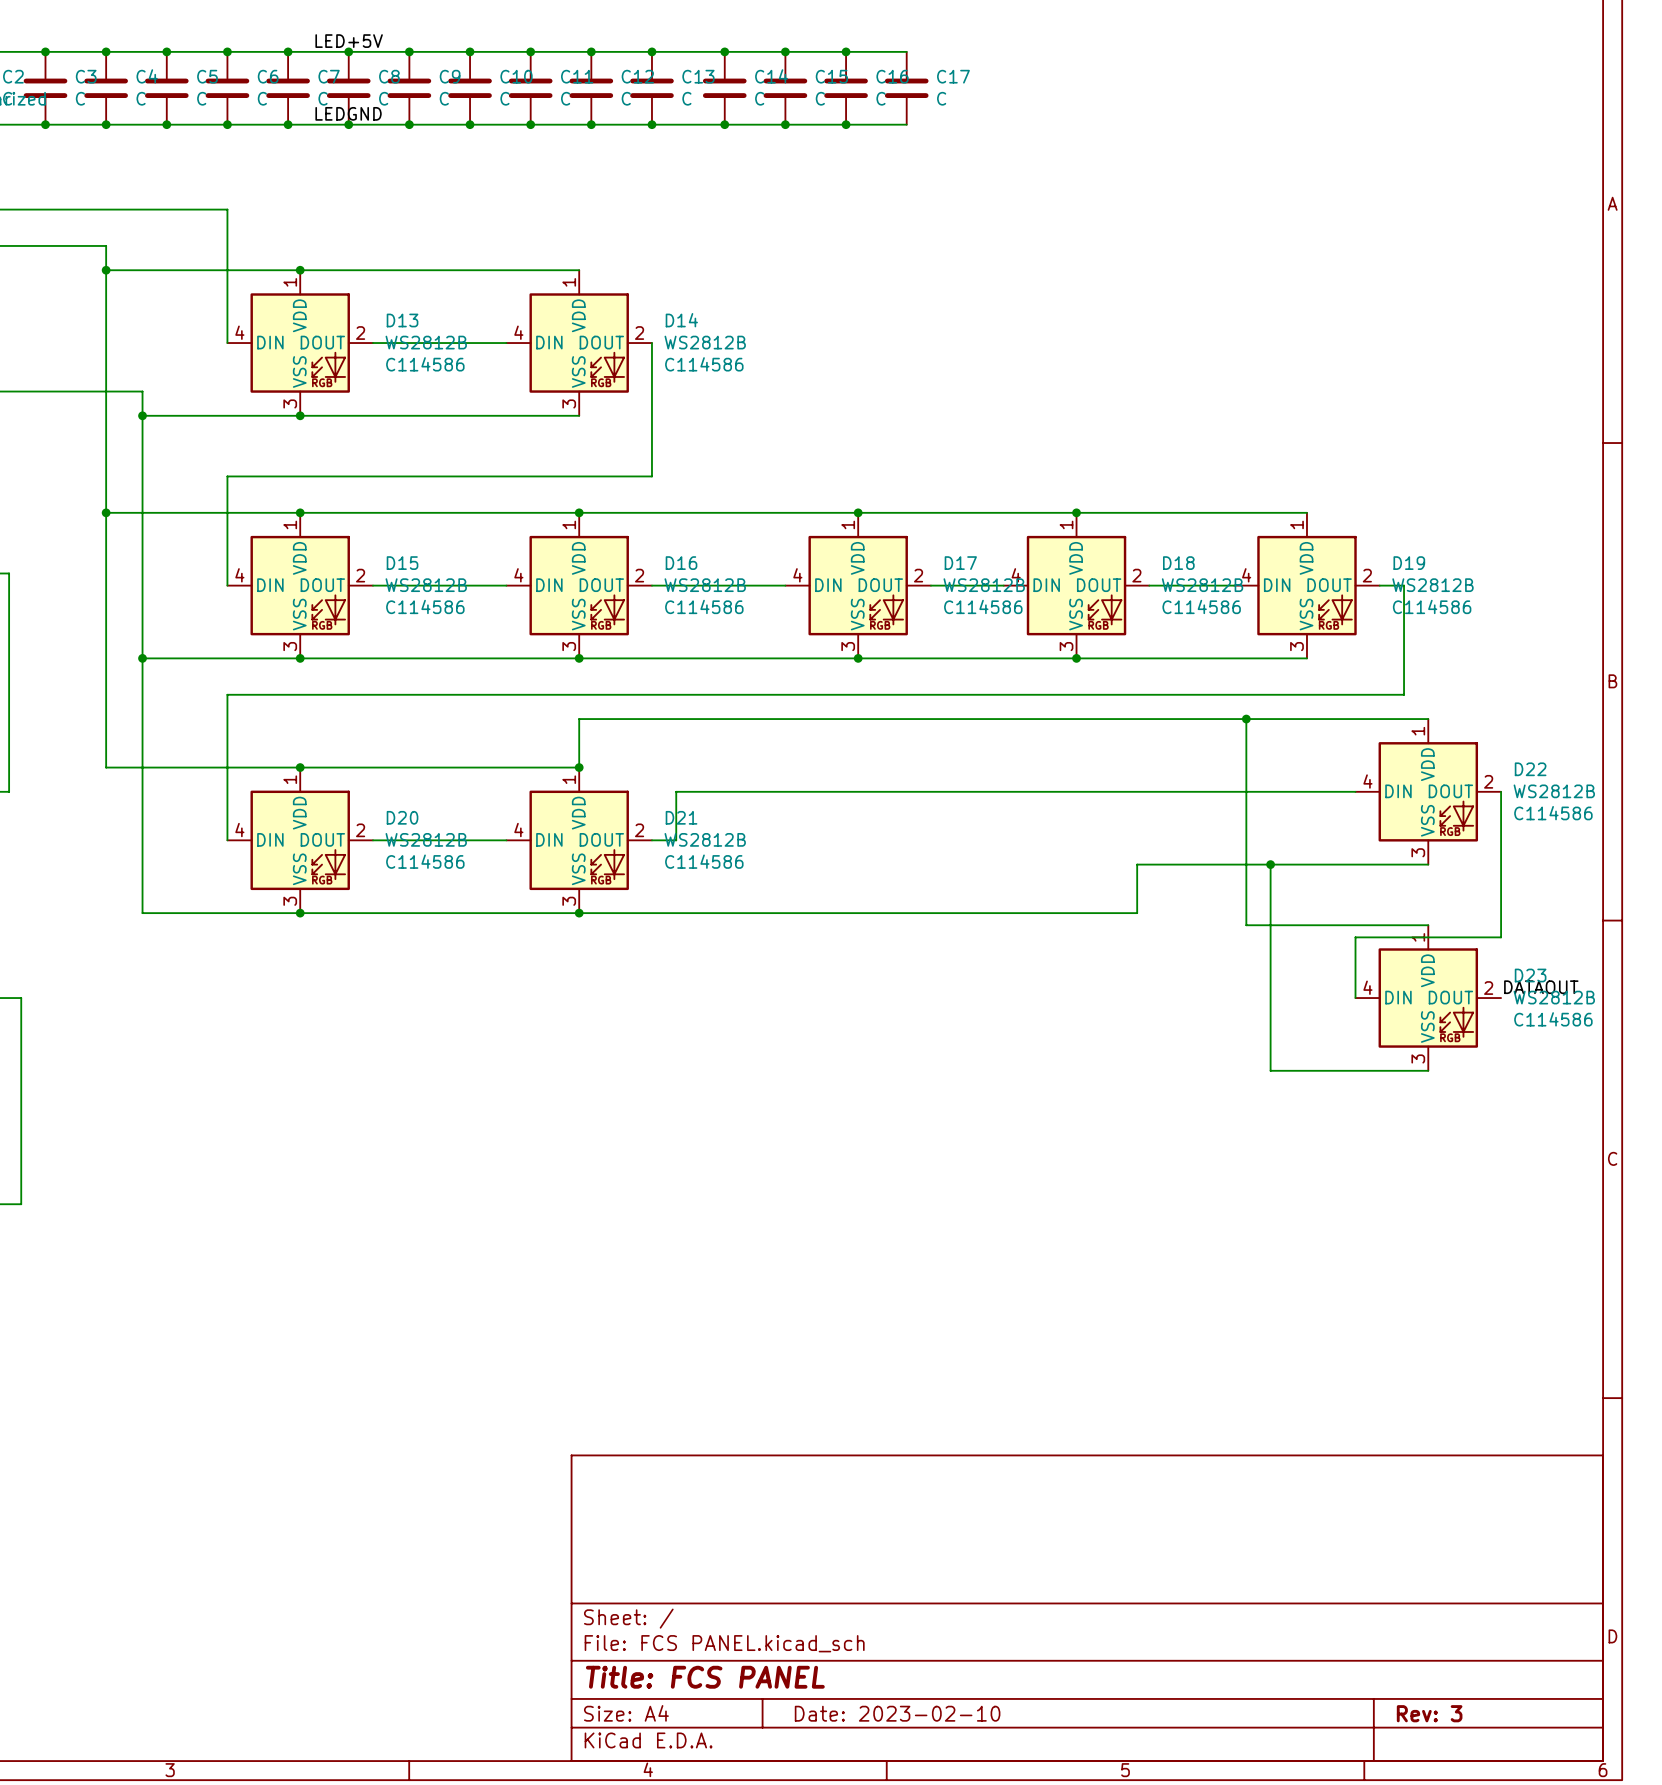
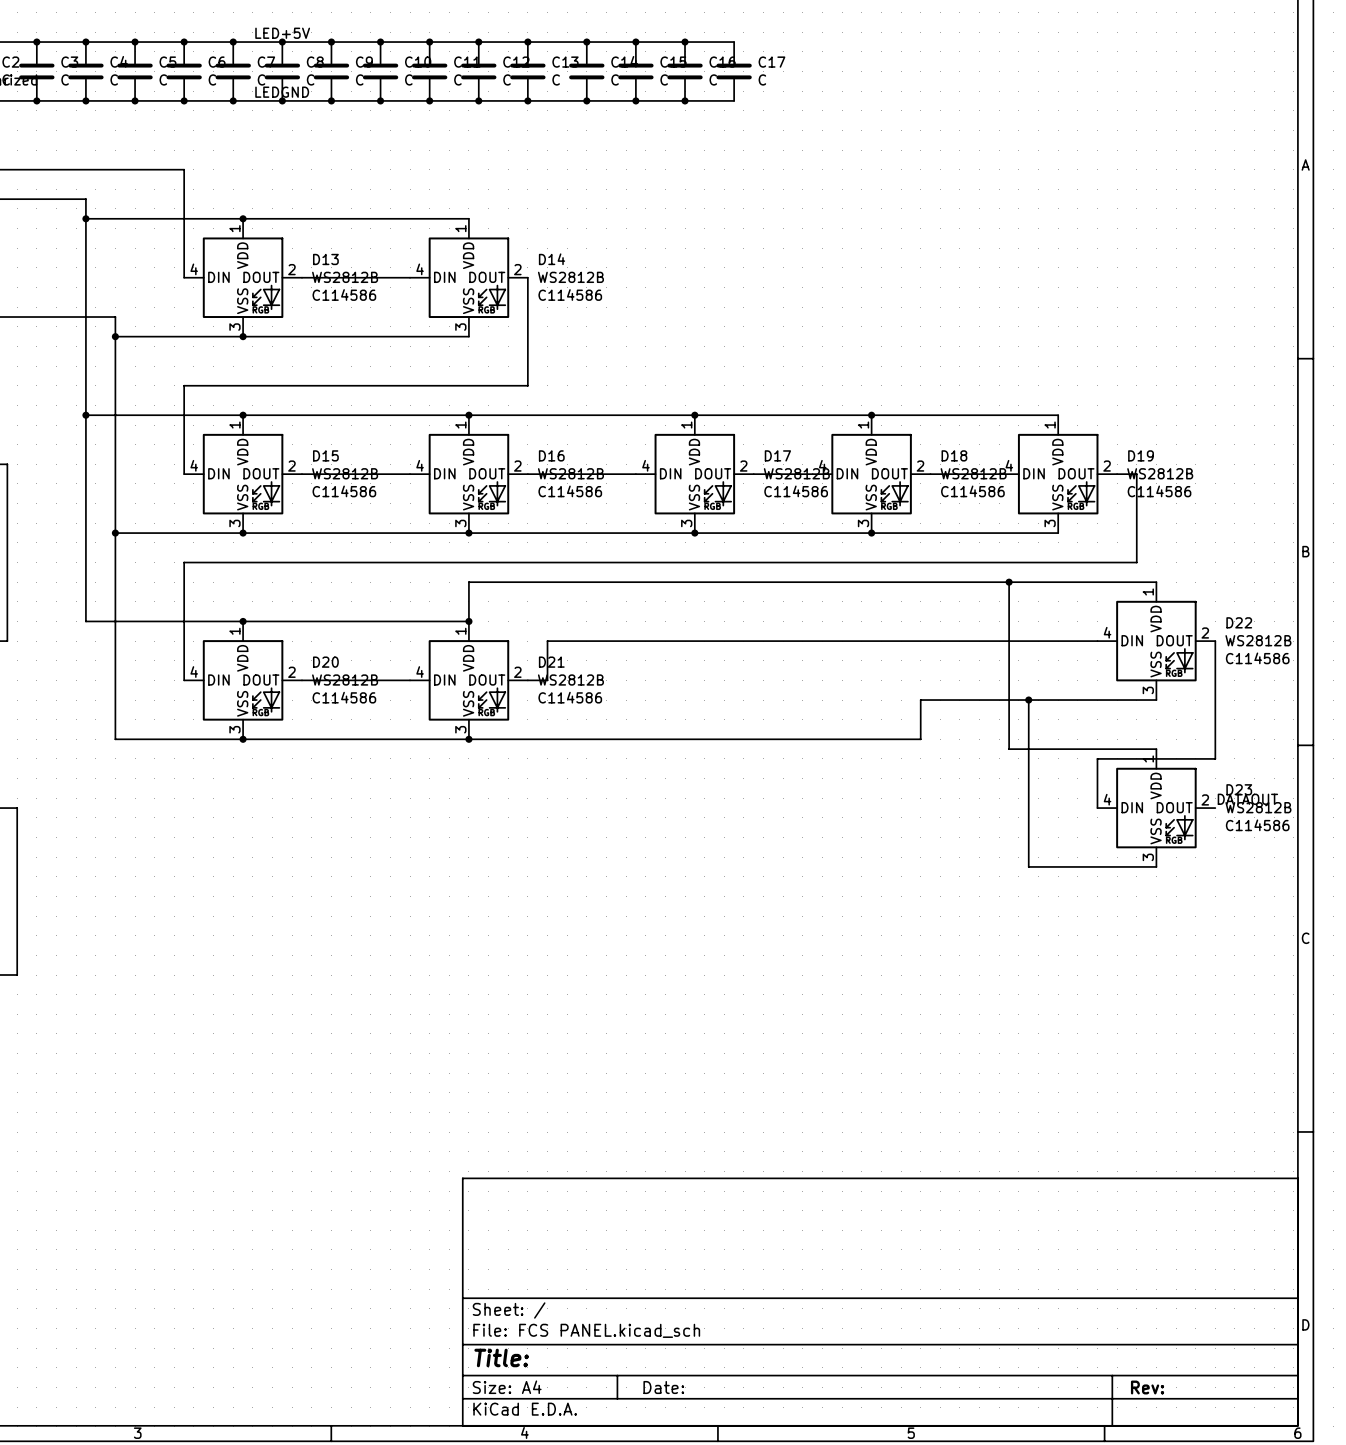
title block: Title: FCS PANEL (705, 1677) -> Title: (501, 1357)
title block: Date: 2023-02-10 (897, 1713) -> Date: (663, 1387)
title block: Rev: 3 (1429, 1713) -> Rev: (1147, 1387)

